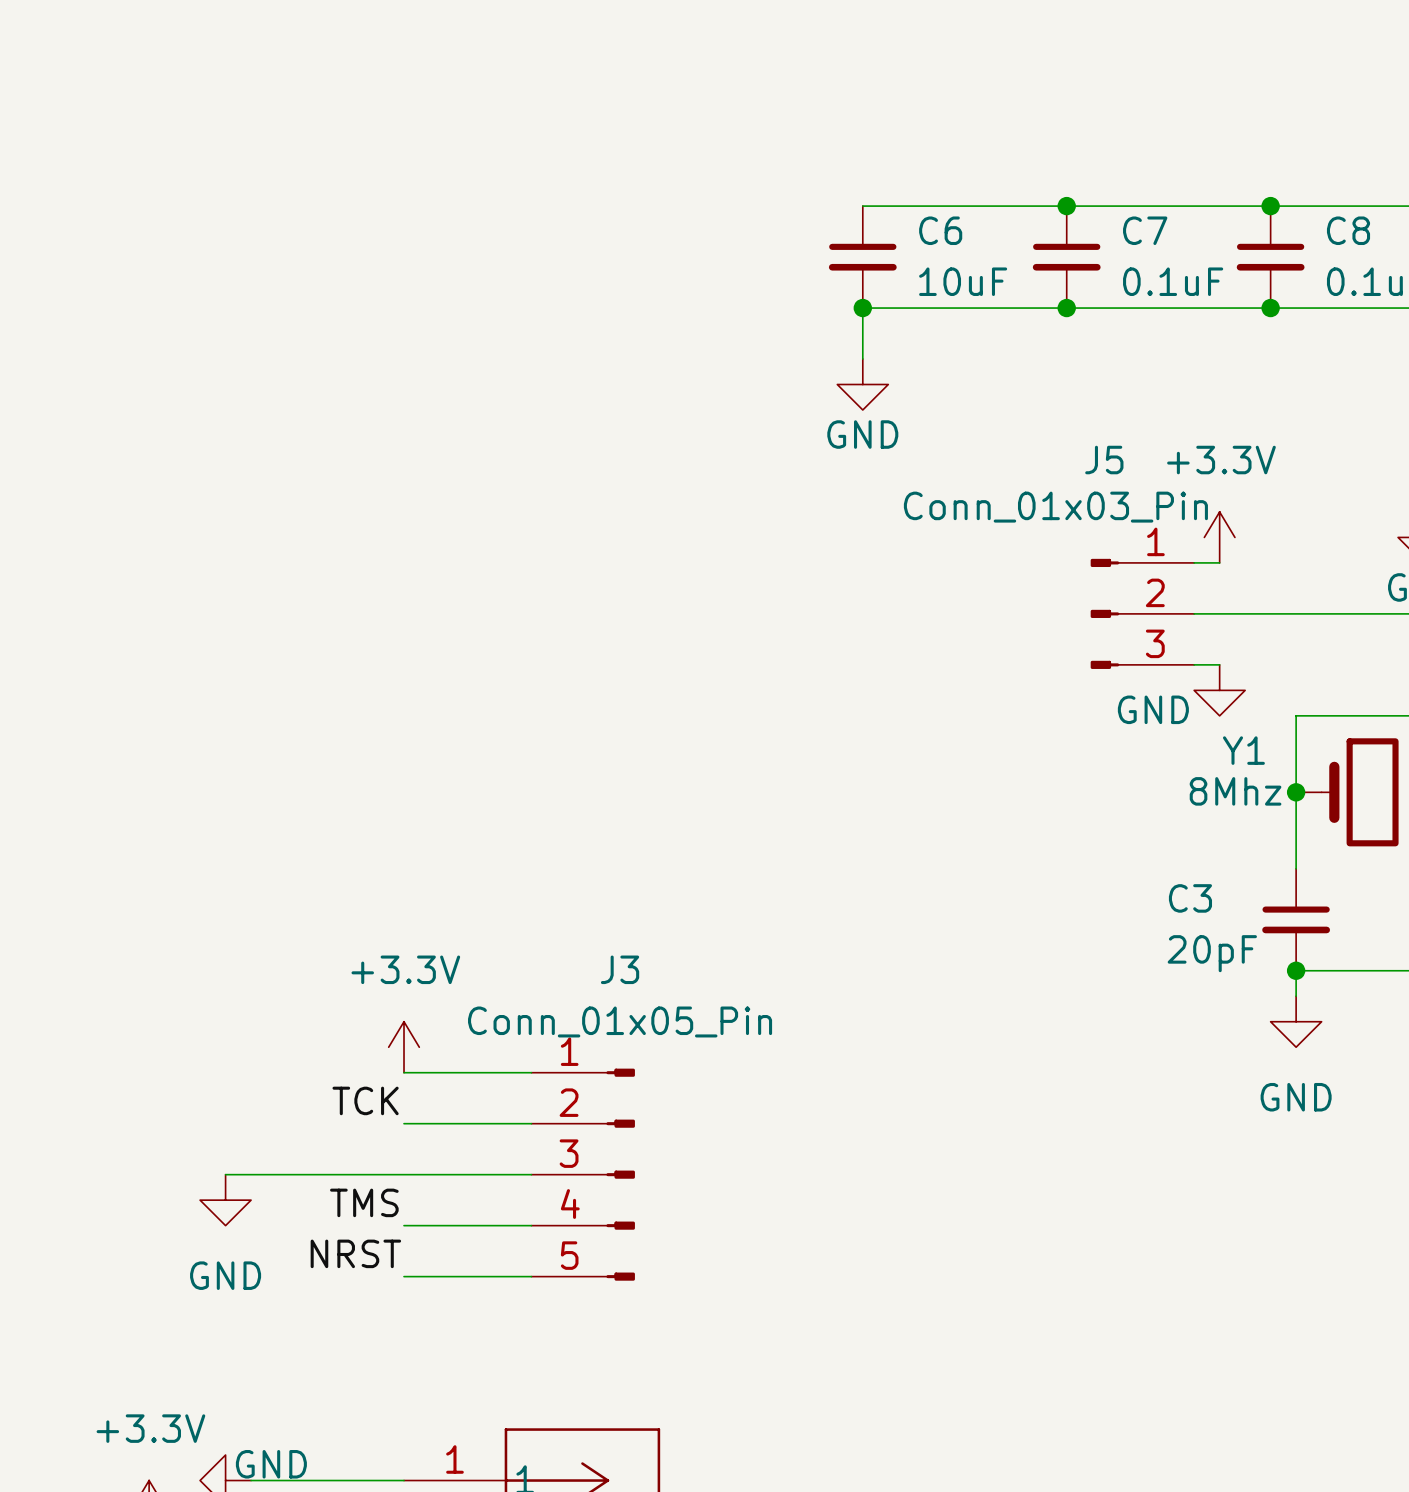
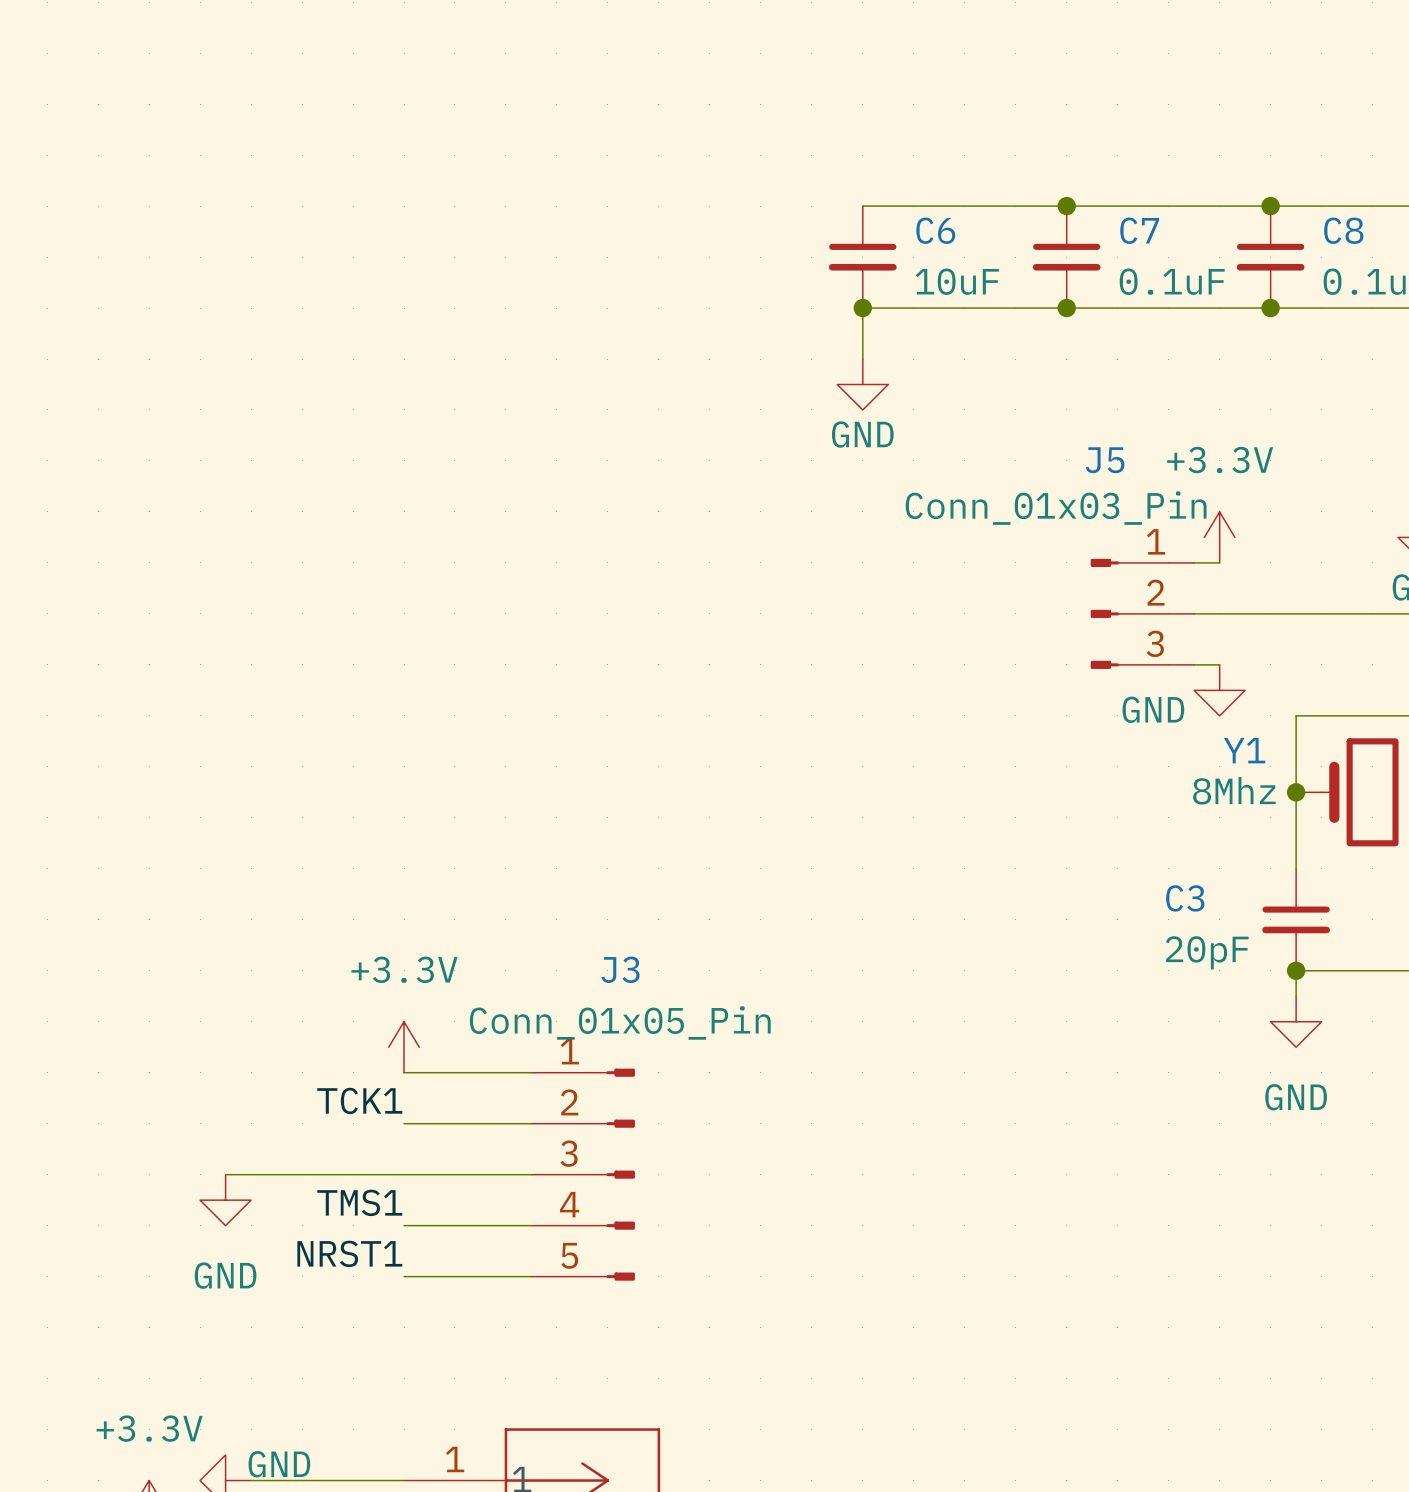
label: TCK (365, 1100) -> TCK1 (359, 1100)
label: TMS (364, 1202) -> TMS1 (359, 1202)
label: NRST (355, 1253) -> NRST1 (349, 1253)

